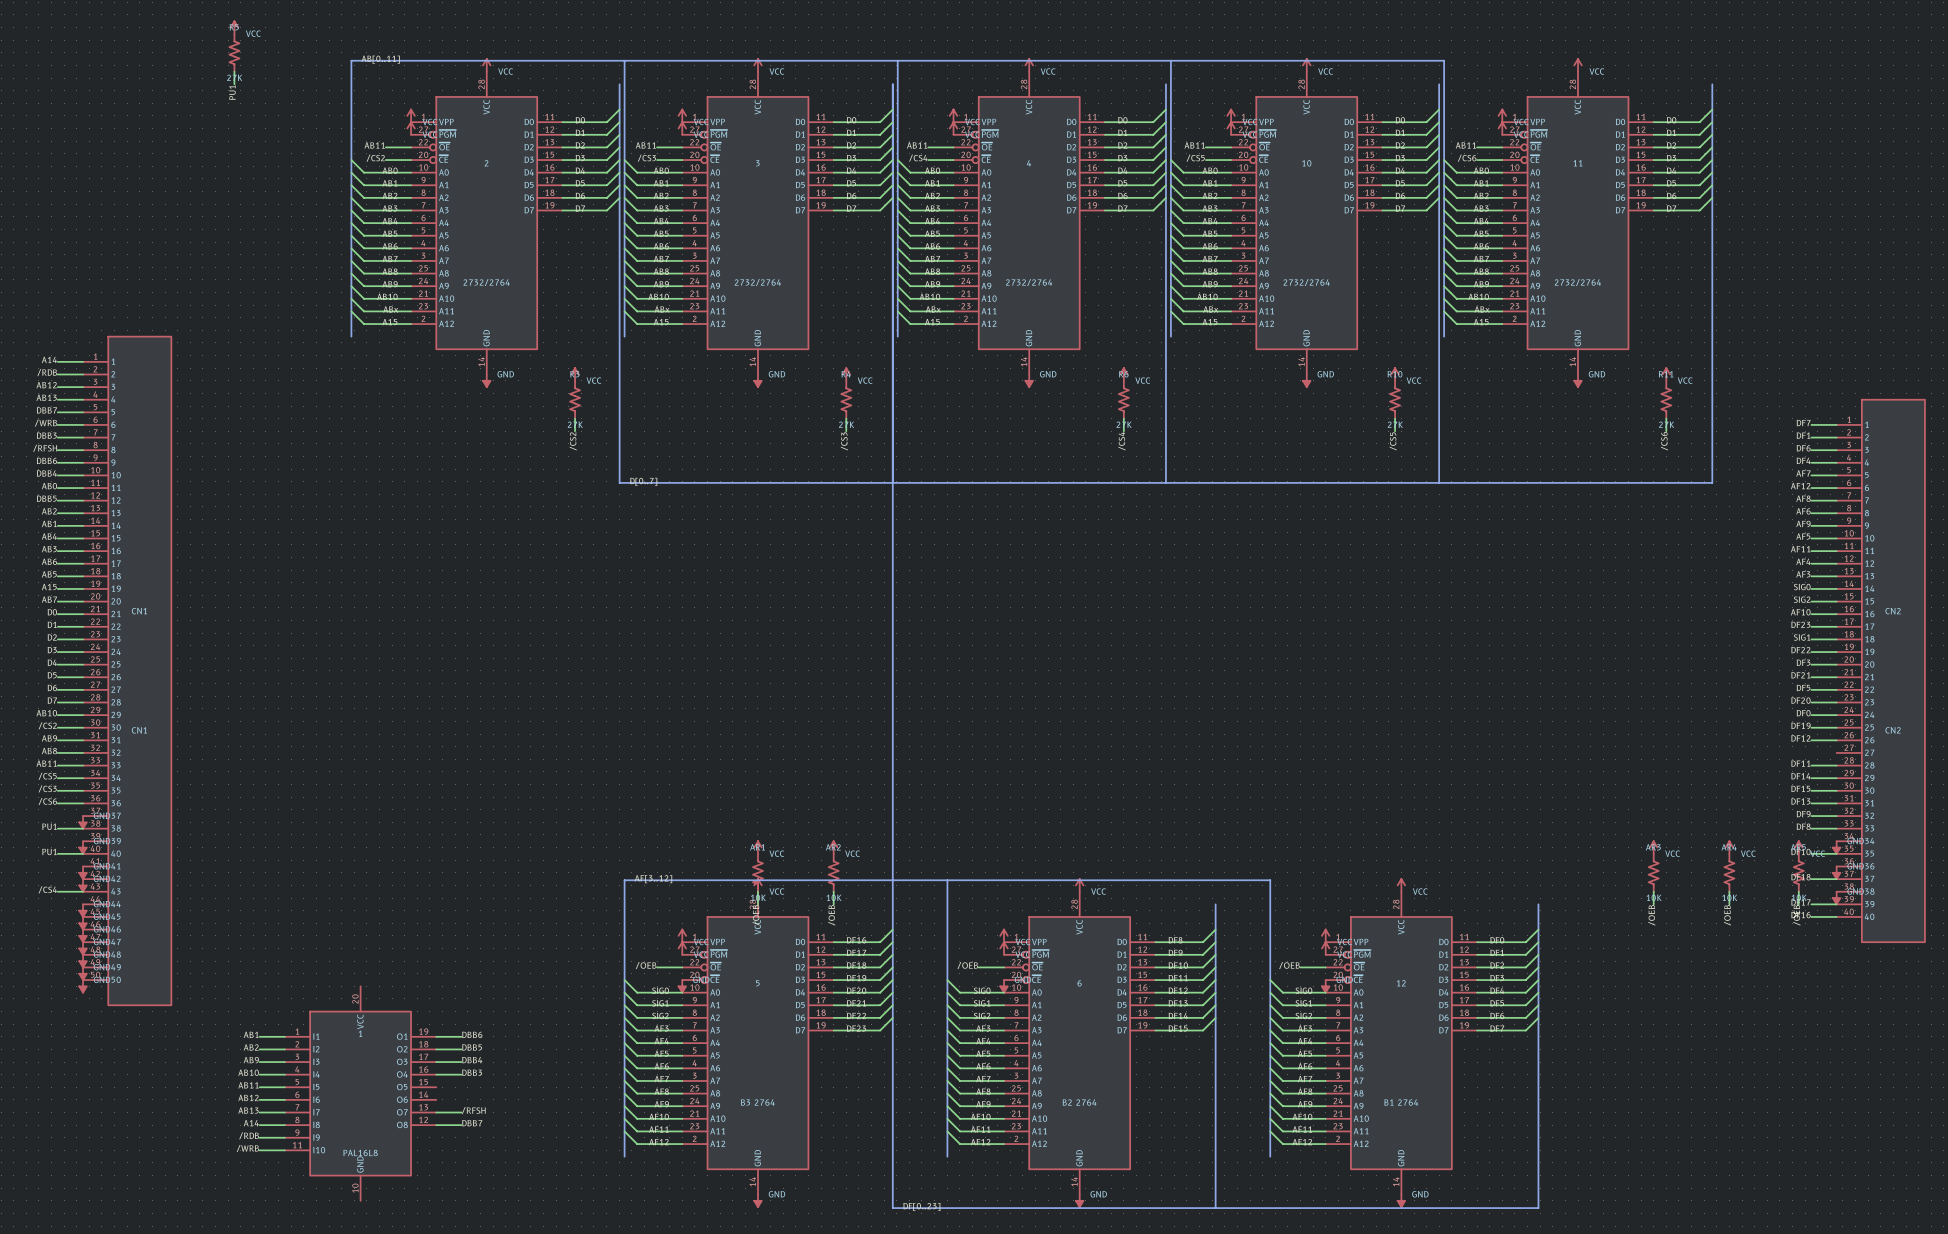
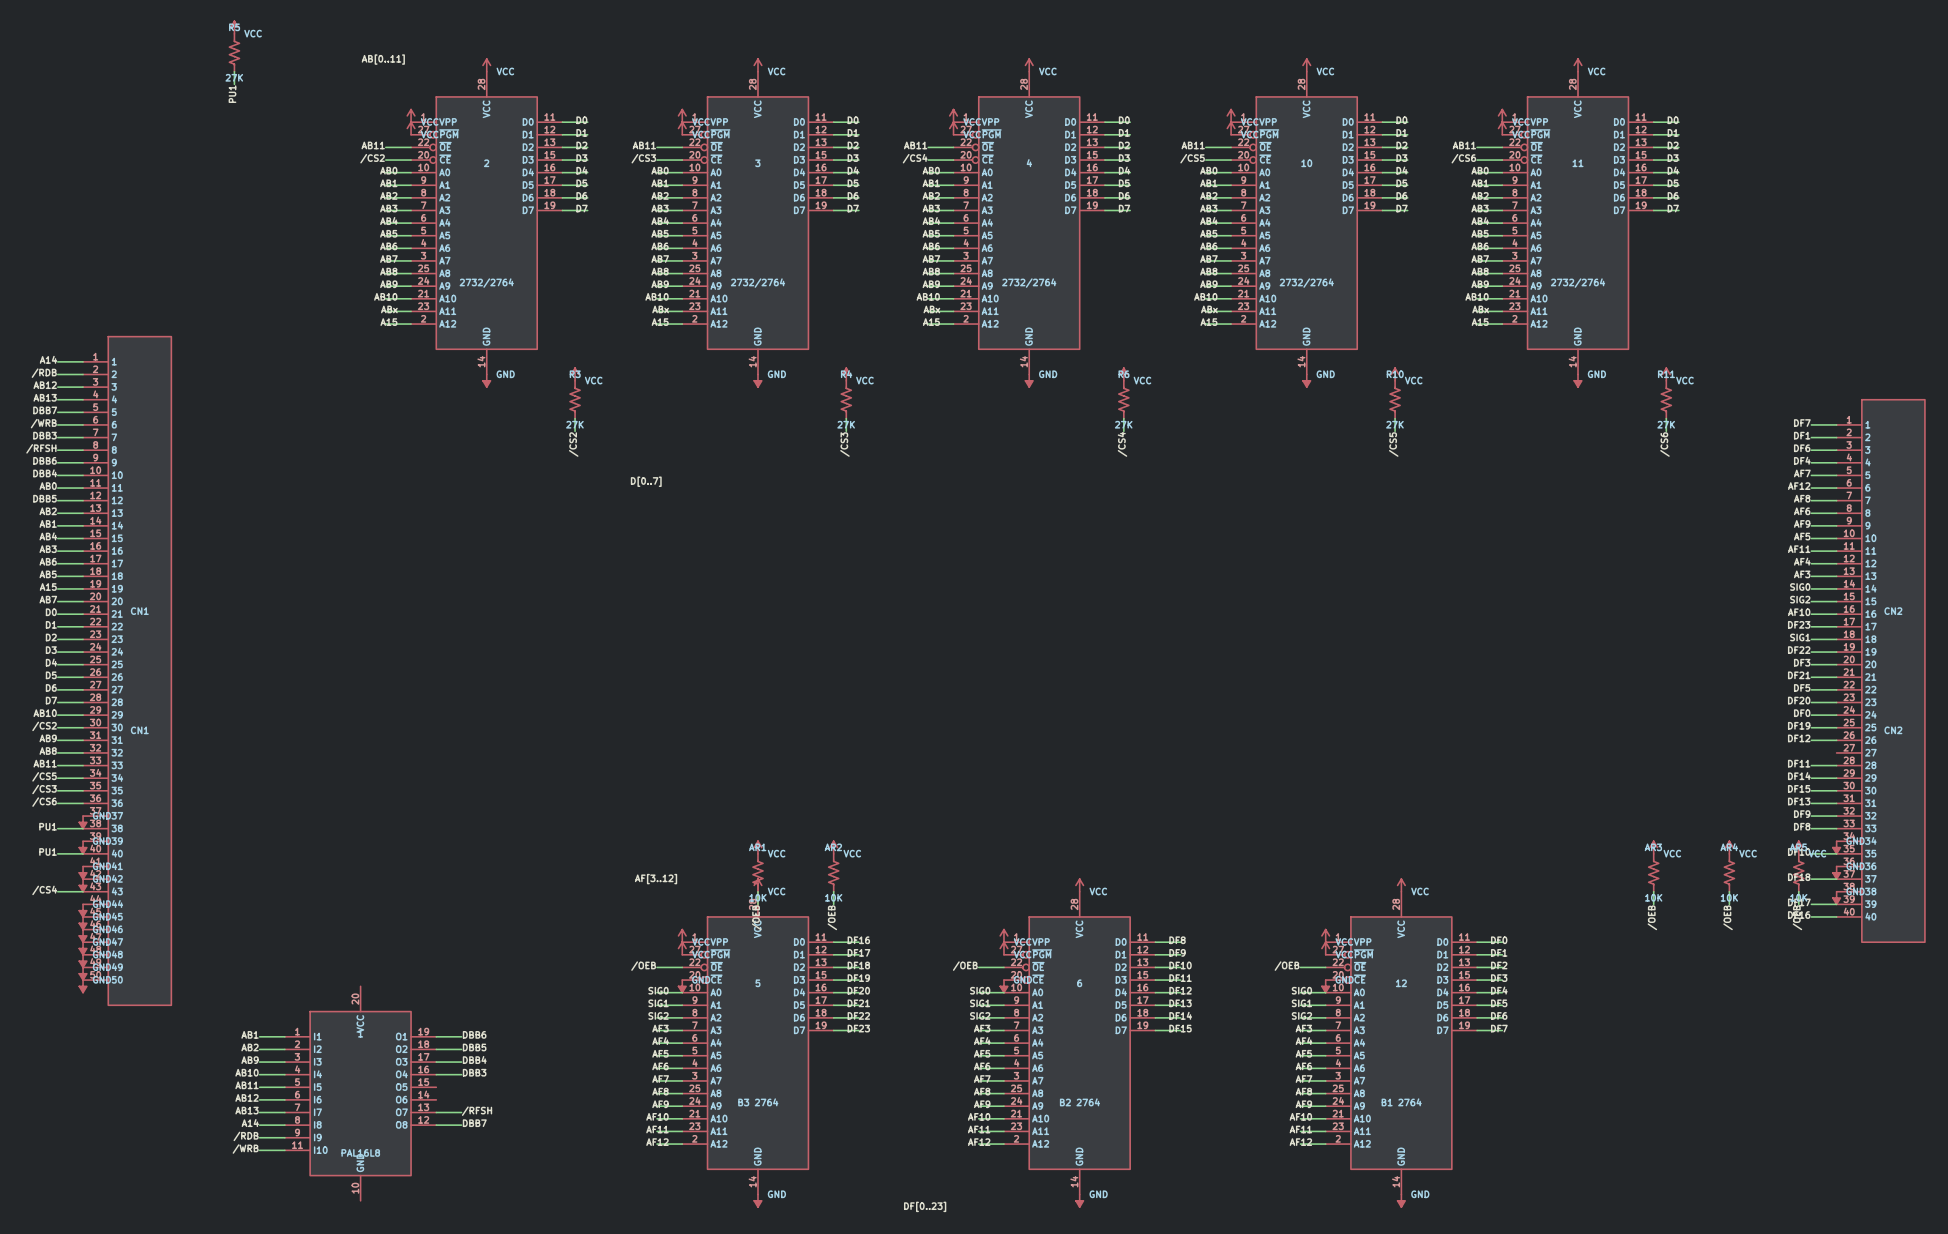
bus: (624, 60) (624, 336) -> none
bus: (897, 60) (897, 336) -> none
bus: (1170, 60) (1170, 336) -> none
bus: (619, 84) (619, 482) (1712, 482) (1712, 84) -> none
bus: (892, 84) (892, 1208) (1538, 1208) (1538, 904) -> none
bus: (1165, 84) (1165, 482) -> none
bus: (1439, 84) (1439, 482) -> none
wire: (619, 109) (606, 122) (587, 122) -> none
wire: (892, 109) (880, 122) (858, 122) -> none
wire: (1165, 109) (1153, 122) (1130, 122) -> none
wire: (1439, 109) (1426, 122) (1407, 122) -> none
wire: (1712, 109) (1699, 122) (1678, 122) -> none
wire: (619, 122) (606, 134) (587, 134) -> none
wire: (892, 122) (880, 134) (858, 134) -> none
wire: (1165, 122) (1153, 134) (1130, 134) -> none
wire: (1439, 122) (1426, 134) (1407, 134) -> none
wire: (1712, 122) (1699, 134) (1678, 134) -> none
wire: (619, 134) (606, 147) (587, 147) -> none
wire: (892, 134) (880, 147) (858, 147) -> none
wire: (1165, 134) (1153, 147) (1130, 147) -> none
wire: (1439, 134) (1426, 147) (1407, 147) -> none
wire: (1712, 134) (1699, 147) (1678, 147) -> none
wire: (619, 147) (606, 160) (587, 160) -> none
wire: (892, 147) (880, 160) (858, 160) -> none
wire: (1165, 147) (1153, 160) (1130, 160) -> none
wire: (1439, 147) (1426, 160) (1407, 160) -> none
wire: (1712, 147) (1699, 160) (1678, 160) -> none
wire: (351, 160) (364, 172) (385, 172) -> none
wire: (619, 160) (606, 172) (587, 172) -> none
wire: (624, 160) (637, 172) (657, 172) -> none
wire: (892, 160) (880, 172) (858, 172) -> none
wire: (897, 160) (910, 172) (928, 172) -> none
wire: (1165, 160) (1153, 172) (1130, 172) -> none
wire: (1170, 160) (1183, 172) (1205, 172) -> none
wire: (1439, 160) (1426, 172) (1407, 172) -> none
wire: (1444, 160) (1456, 172) (1477, 172) -> none
wire: (1712, 160) (1699, 172) (1678, 172) -> none
wire: (351, 172) (364, 185) (385, 185) -> none
wire: (619, 172) (606, 185) (587, 185) -> none
wire: (624, 172) (637, 185) (657, 185) -> none
wire: (892, 172) (880, 185) (858, 185) -> none
wire: (897, 172) (910, 185) (928, 185) -> none
wire: (1165, 172) (1153, 185) (1130, 185) -> none
wire: (1170, 172) (1183, 185) (1205, 185) -> none
wire: (1439, 172) (1426, 185) (1407, 185) -> none
wire: (1444, 172) (1456, 185) (1477, 185) -> none
wire: (1712, 172) (1699, 185) (1678, 185) -> none
wire: (351, 185) (364, 197) (385, 197) -> none
wire: (619, 185) (606, 197) (587, 197) -> none
wire: (624, 185) (637, 197) (657, 197) -> none
wire: (892, 185) (880, 197) (858, 197) -> none
wire: (897, 185) (910, 197) (928, 197) -> none
wire: (1165, 185) (1153, 197) (1130, 197) -> none
wire: (1170, 185) (1183, 197) (1205, 197) -> none
wire: (1439, 185) (1426, 197) (1407, 197) -> none
wire: (1444, 185) (1456, 197) (1477, 197) -> none
wire: (1712, 185) (1699, 197) (1678, 197) -> none
wire: (351, 197) (364, 210) (385, 210) -> none
wire: (619, 197) (606, 210) (587, 210) -> none
wire: (624, 197) (637, 210) (657, 210) -> none
wire: (892, 197) (880, 210) (858, 210) -> none
wire: (897, 197) (910, 210) (928, 210) -> none
wire: (1165, 197) (1153, 210) (1130, 210) -> none
wire: (1170, 197) (1183, 210) (1205, 210) -> none
wire: (1439, 197) (1426, 210) (1407, 210) -> none
wire: (1444, 197) (1456, 210) (1477, 210) -> none
wire: (1712, 197) (1699, 210) (1678, 210) -> none
wire: (351, 210) (364, 223) (385, 223) -> none
wire: (624, 210) (637, 223) (657, 223) -> none
wire: (897, 210) (910, 223) (928, 223) -> none
wire: (1170, 210) (1183, 223) (1205, 223) -> none
wire: (1444, 210) (1456, 223) (1477, 223) -> none
wire: (351, 223) (364, 235) (385, 235) -> none
wire: (624, 223) (637, 235) (657, 235) -> none
wire: (897, 223) (910, 235) (928, 235) -> none
wire: (1170, 223) (1183, 235) (1205, 235) -> none
wire: (1444, 223) (1456, 235) (1477, 235) -> none
wire: (351, 235) (364, 248) (385, 248) -> none
wire: (624, 235) (637, 248) (657, 248) -> none
wire: (897, 235) (910, 248) (928, 248) -> none
wire: (1170, 235) (1183, 248) (1205, 248) -> none
wire: (1444, 235) (1456, 248) (1477, 248) -> none
wire: (351, 248) (364, 260) (385, 260) -> none
wire: (624, 248) (637, 260) (657, 260) -> none
wire: (897, 248) (910, 260) (928, 260) -> none
wire: (1170, 248) (1183, 260) (1205, 260) -> none
wire: (1444, 248) (1456, 260) (1477, 260) -> none
wire: (351, 260) (364, 273) (385, 273) -> none
wire: (624, 260) (637, 273) (657, 273) -> none
wire: (897, 260) (910, 273) (928, 273) -> none
wire: (1170, 260) (1183, 273) (1205, 273) -> none
wire: (1444, 260) (1456, 273) (1477, 273) -> none
wire: (351, 273) (364, 286) (385, 286) -> none
wire: (624, 273) (637, 286) (657, 286) -> none
wire: (897, 273) (910, 286) (928, 286) -> none
wire: (1170, 273) (1183, 286) (1205, 286) -> none
wire: (1444, 273) (1456, 286) (1477, 286) -> none
wire: (351, 286) (364, 298) (385, 298) -> none
wire: (624, 286) (637, 298) (657, 298) -> none
wire: (897, 286) (910, 298) (928, 298) -> none
wire: (1170, 286) (1183, 298) (1205, 298) -> none
wire: (1444, 286) (1456, 298) (1477, 298) -> none
wire: (351, 298) (364, 311) (385, 311) -> none
wire: (624, 298) (637, 311) (657, 311) -> none
wire: (897, 298) (910, 311) (928, 311) -> none
wire: (1170, 298) (1183, 311) (1205, 311) -> none
wire: (1444, 298) (1456, 311) (1477, 311) -> none
wire: (351, 311) (364, 324) (385, 324) -> none
wire: (624, 311) (637, 324) (657, 324) -> none
wire: (897, 311) (910, 324) (928, 324) -> none
wire: (1170, 311) (1183, 324) (1205, 324) -> none
wire: (1444, 311) (1456, 324) (1477, 324) -> none
bus: (351, 336) (351, 60) (1444, 60) (1444, 336) -> none
bus: (947, 880) (947, 1156) -> none
bus: (1215, 904) (1215, 1208) -> none
wire: (892, 929) (880, 942) (858, 942) -> none
wire: (1215, 929) (1203, 942) (1180, 942) -> none
wire: (1538, 929) (1525, 942) (1502, 942) -> none
wire: (892, 942) (880, 954) (858, 954) -> none
wire: (1215, 942) (1203, 954) (1180, 954) -> none
wire: (1538, 942) (1525, 954) (1502, 954) -> none
wire: (892, 954) (880, 967) (858, 967) -> none
wire: (1215, 954) (1203, 967) (1180, 967) -> none
wire: (1538, 954) (1525, 967) (1502, 967) -> none
wire: (892, 967) (880, 980) (858, 980) -> none
wire: (1215, 967) (1203, 980) (1180, 980) -> none
wire: (1538, 967) (1525, 980) (1502, 980) -> none
wire: (624, 980) (637, 992) (657, 992) -> none
wire: (892, 980) (880, 992) (858, 992) -> none
wire: (947, 980) (960, 992) (978, 992) -> none
wire: (1215, 980) (1203, 992) (1180, 992) -> none
wire: (1270, 980) (1282, 992) (1300, 992) -> none
wire: (1538, 980) (1525, 992) (1502, 992) -> none
wire: (624, 992) (637, 1005) (657, 1005) -> none
wire: (892, 992) (880, 1005) (858, 1005) -> none
wire: (947, 992) (960, 1005) (978, 1005) -> none
wire: (1215, 992) (1203, 1005) (1180, 1005) -> none
wire: (1270, 992) (1282, 1005) (1300, 1005) -> none
wire: (1538, 992) (1525, 1005) (1502, 1005) -> none
wire: (624, 1005) (637, 1017) (657, 1017) -> none
wire: (892, 1005) (880, 1017) (858, 1017) -> none
wire: (947, 1005) (960, 1017) (978, 1017) -> none
wire: (1215, 1005) (1203, 1017) (1180, 1017) -> none
wire: (1270, 1005) (1282, 1017) (1300, 1017) -> none
wire: (1538, 1005) (1525, 1017) (1502, 1017) -> none
wire: (624, 1017) (637, 1030) (657, 1030) -> none
wire: (892, 1017) (880, 1030) (858, 1030) -> none
wire: (947, 1017) (960, 1030) (978, 1030) -> none
wire: (1215, 1017) (1203, 1030) (1180, 1030) -> none
wire: (1270, 1017) (1282, 1030) (1300, 1030) -> none
wire: (1538, 1017) (1525, 1030) (1502, 1030) -> none
wire: (624, 1030) (637, 1043) (657, 1043) -> none
wire: (947, 1030) (960, 1043) (978, 1043) -> none
wire: (1270, 1030) (1282, 1043) (1300, 1043) -> none
wire: (624, 1043) (637, 1055) (657, 1055) -> none
wire: (947, 1043) (960, 1055) (978, 1055) -> none
wire: (1270, 1043) (1282, 1055) (1300, 1055) -> none
wire: (624, 1055) (637, 1068) (657, 1068) -> none
wire: (947, 1055) (960, 1068) (978, 1068) -> none
wire: (1270, 1055) (1282, 1068) (1300, 1068) -> none
wire: (624, 1068) (637, 1080) (657, 1080) -> none
wire: (947, 1068) (960, 1080) (978, 1080) -> none
wire: (1270, 1068) (1282, 1080) (1300, 1080) -> none
wire: (624, 1080) (637, 1093) (657, 1093) -> none
wire: (947, 1080) (960, 1093) (978, 1093) -> none
wire: (1270, 1080) (1282, 1093) (1300, 1093) -> none
wire: (624, 1093) (637, 1106) (657, 1106) -> none
wire: (947, 1093) (960, 1106) (978, 1106) -> none
wire: (1270, 1093) (1282, 1106) (1300, 1106) -> none
wire: (624, 1106) (637, 1118) (657, 1118) -> none
wire: (947, 1106) (960, 1118) (978, 1118) -> none
wire: (1270, 1106) (1282, 1118) (1300, 1118) -> none
wire: (624, 1118) (637, 1131) (657, 1131) -> none
wire: (947, 1118) (960, 1131) (978, 1131) -> none
wire: (1270, 1118) (1282, 1131) (1300, 1131) -> none
wire: (624, 1131) (637, 1144) (657, 1144) -> none
wire: (947, 1131) (960, 1144) (978, 1144) -> none
wire: (1270, 1131) (1282, 1144) (1300, 1144) -> none
bus: (624, 1156) (624, 880) (1270, 880) (1270, 1156) -> none

